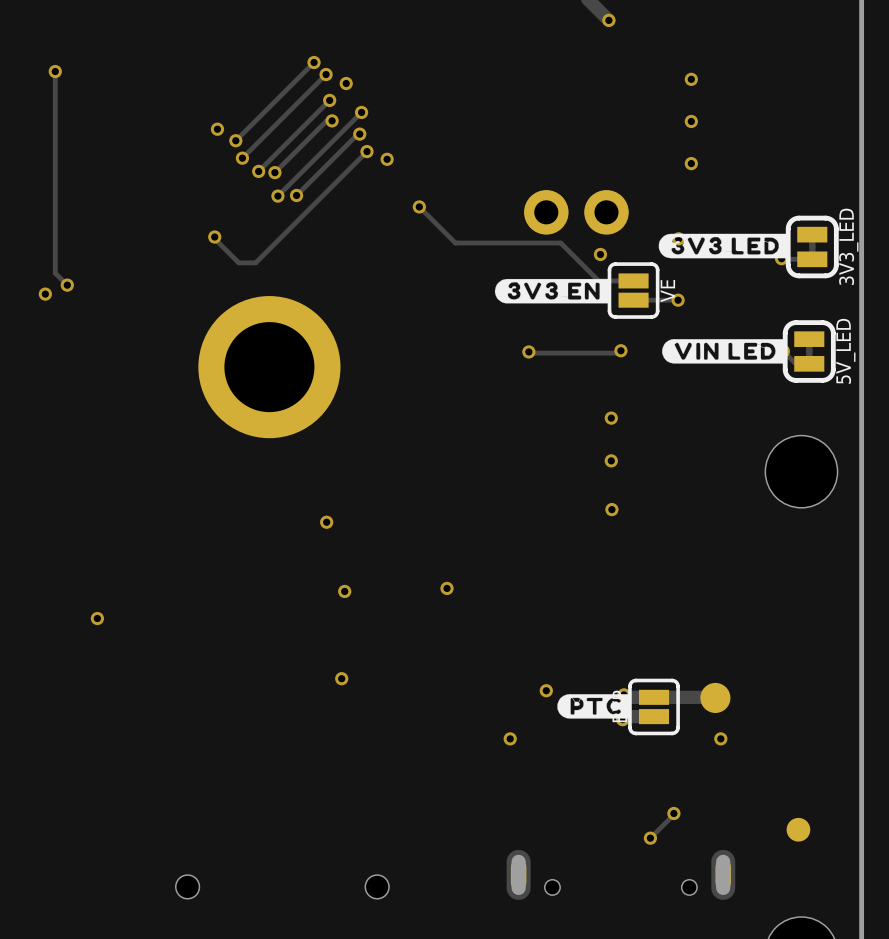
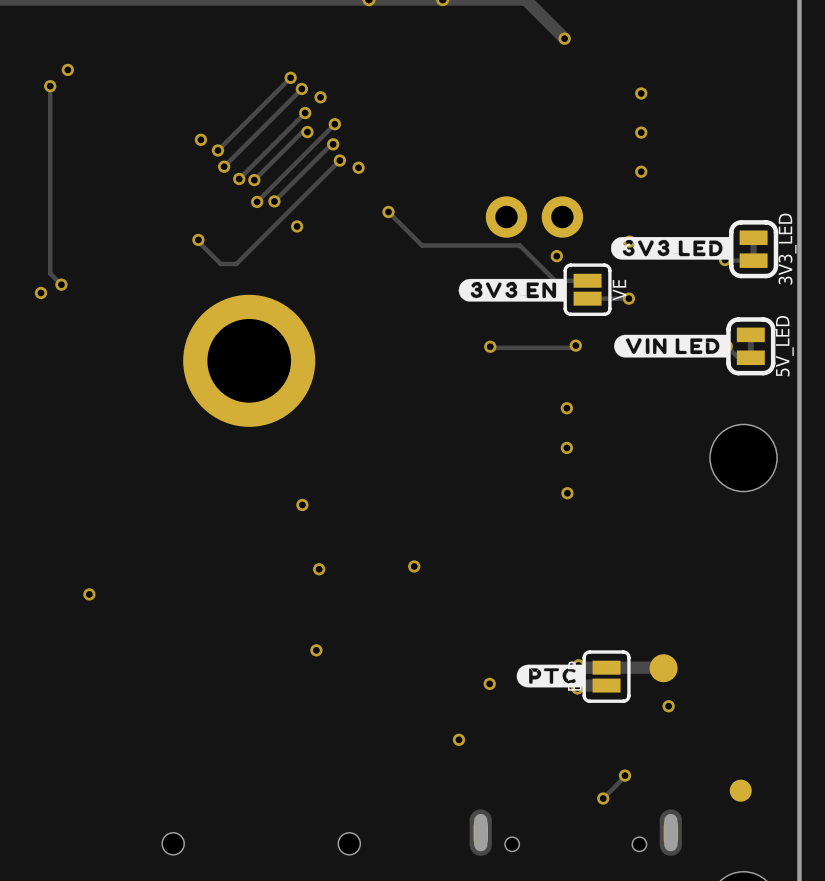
via: none -> (67, 69)
via: none -> (297, 226)
via: (546, 690) -> none
via: none -> (489, 683)
via: (510, 738) -> none
via: none -> (458, 739)

